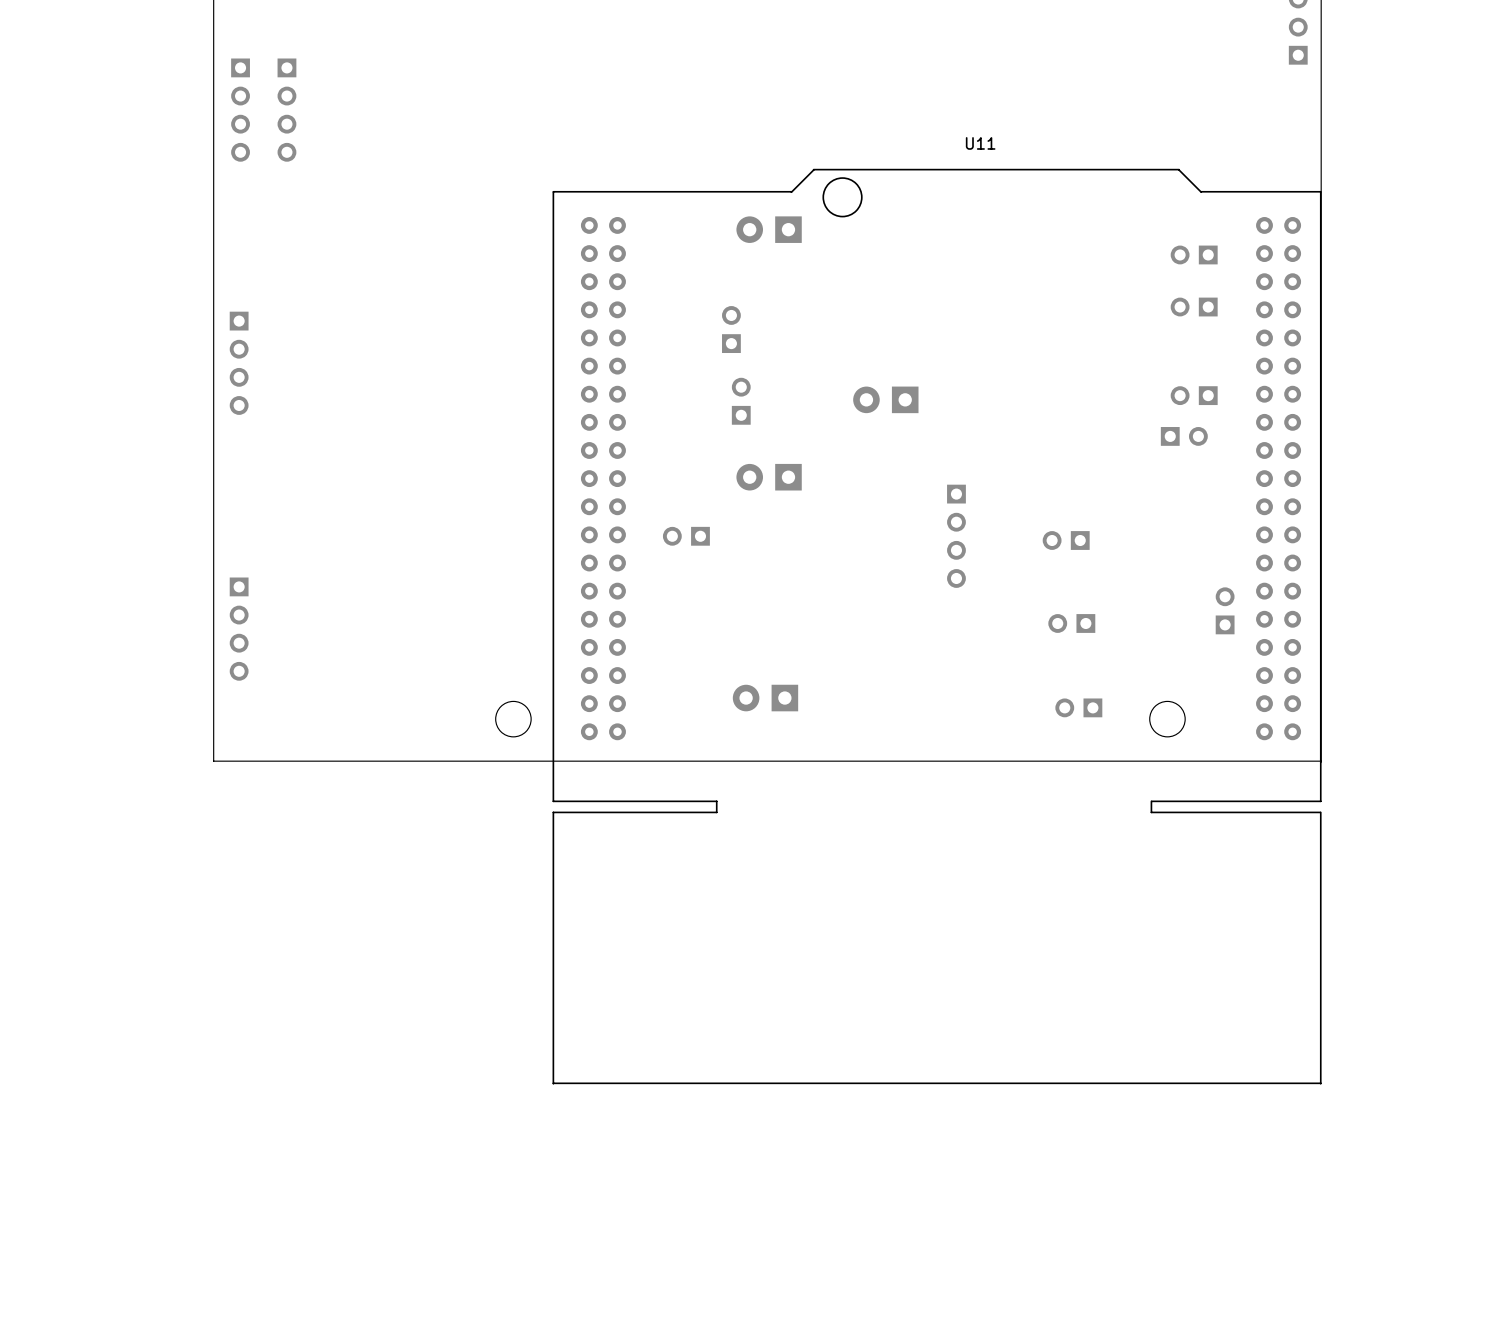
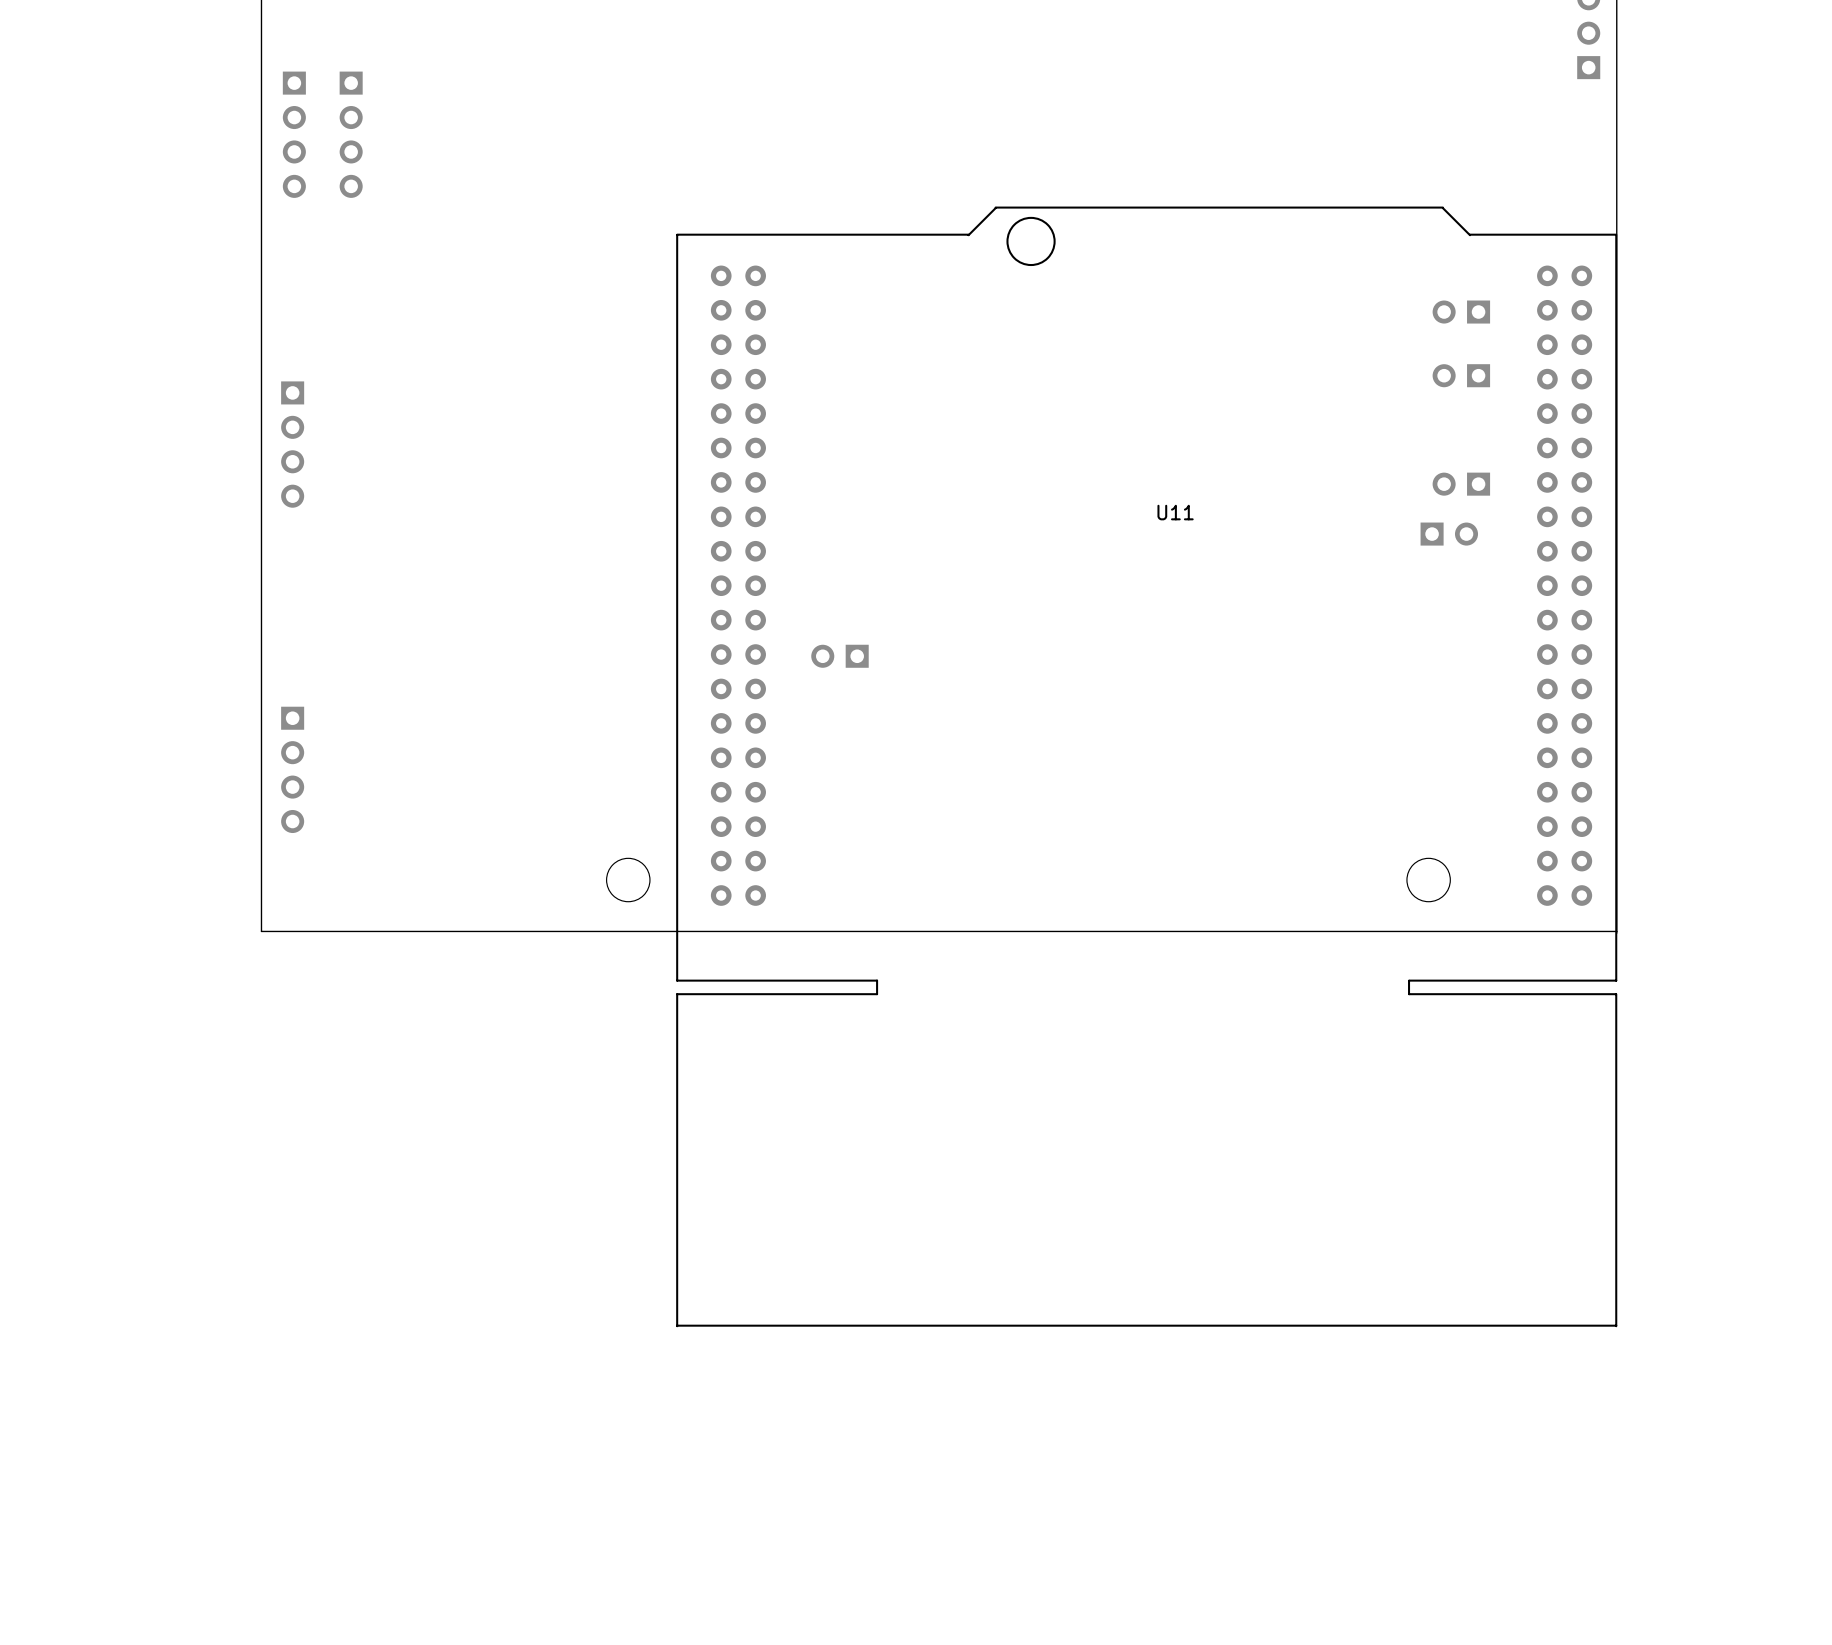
U11 name position: U11 (980, 143) -> U11 (1175, 512)
part: (769, 229) -> none
part: (731, 329) -> none
part: (885, 399) -> none
part: (741, 401) -> none
part: (769, 477) -> none
part: (956, 536) -> none
part: (1066, 540) -> none
part: (1225, 610) -> none
part: (1071, 623) -> none
part: (765, 698) -> none
part: (1078, 707) -> none

